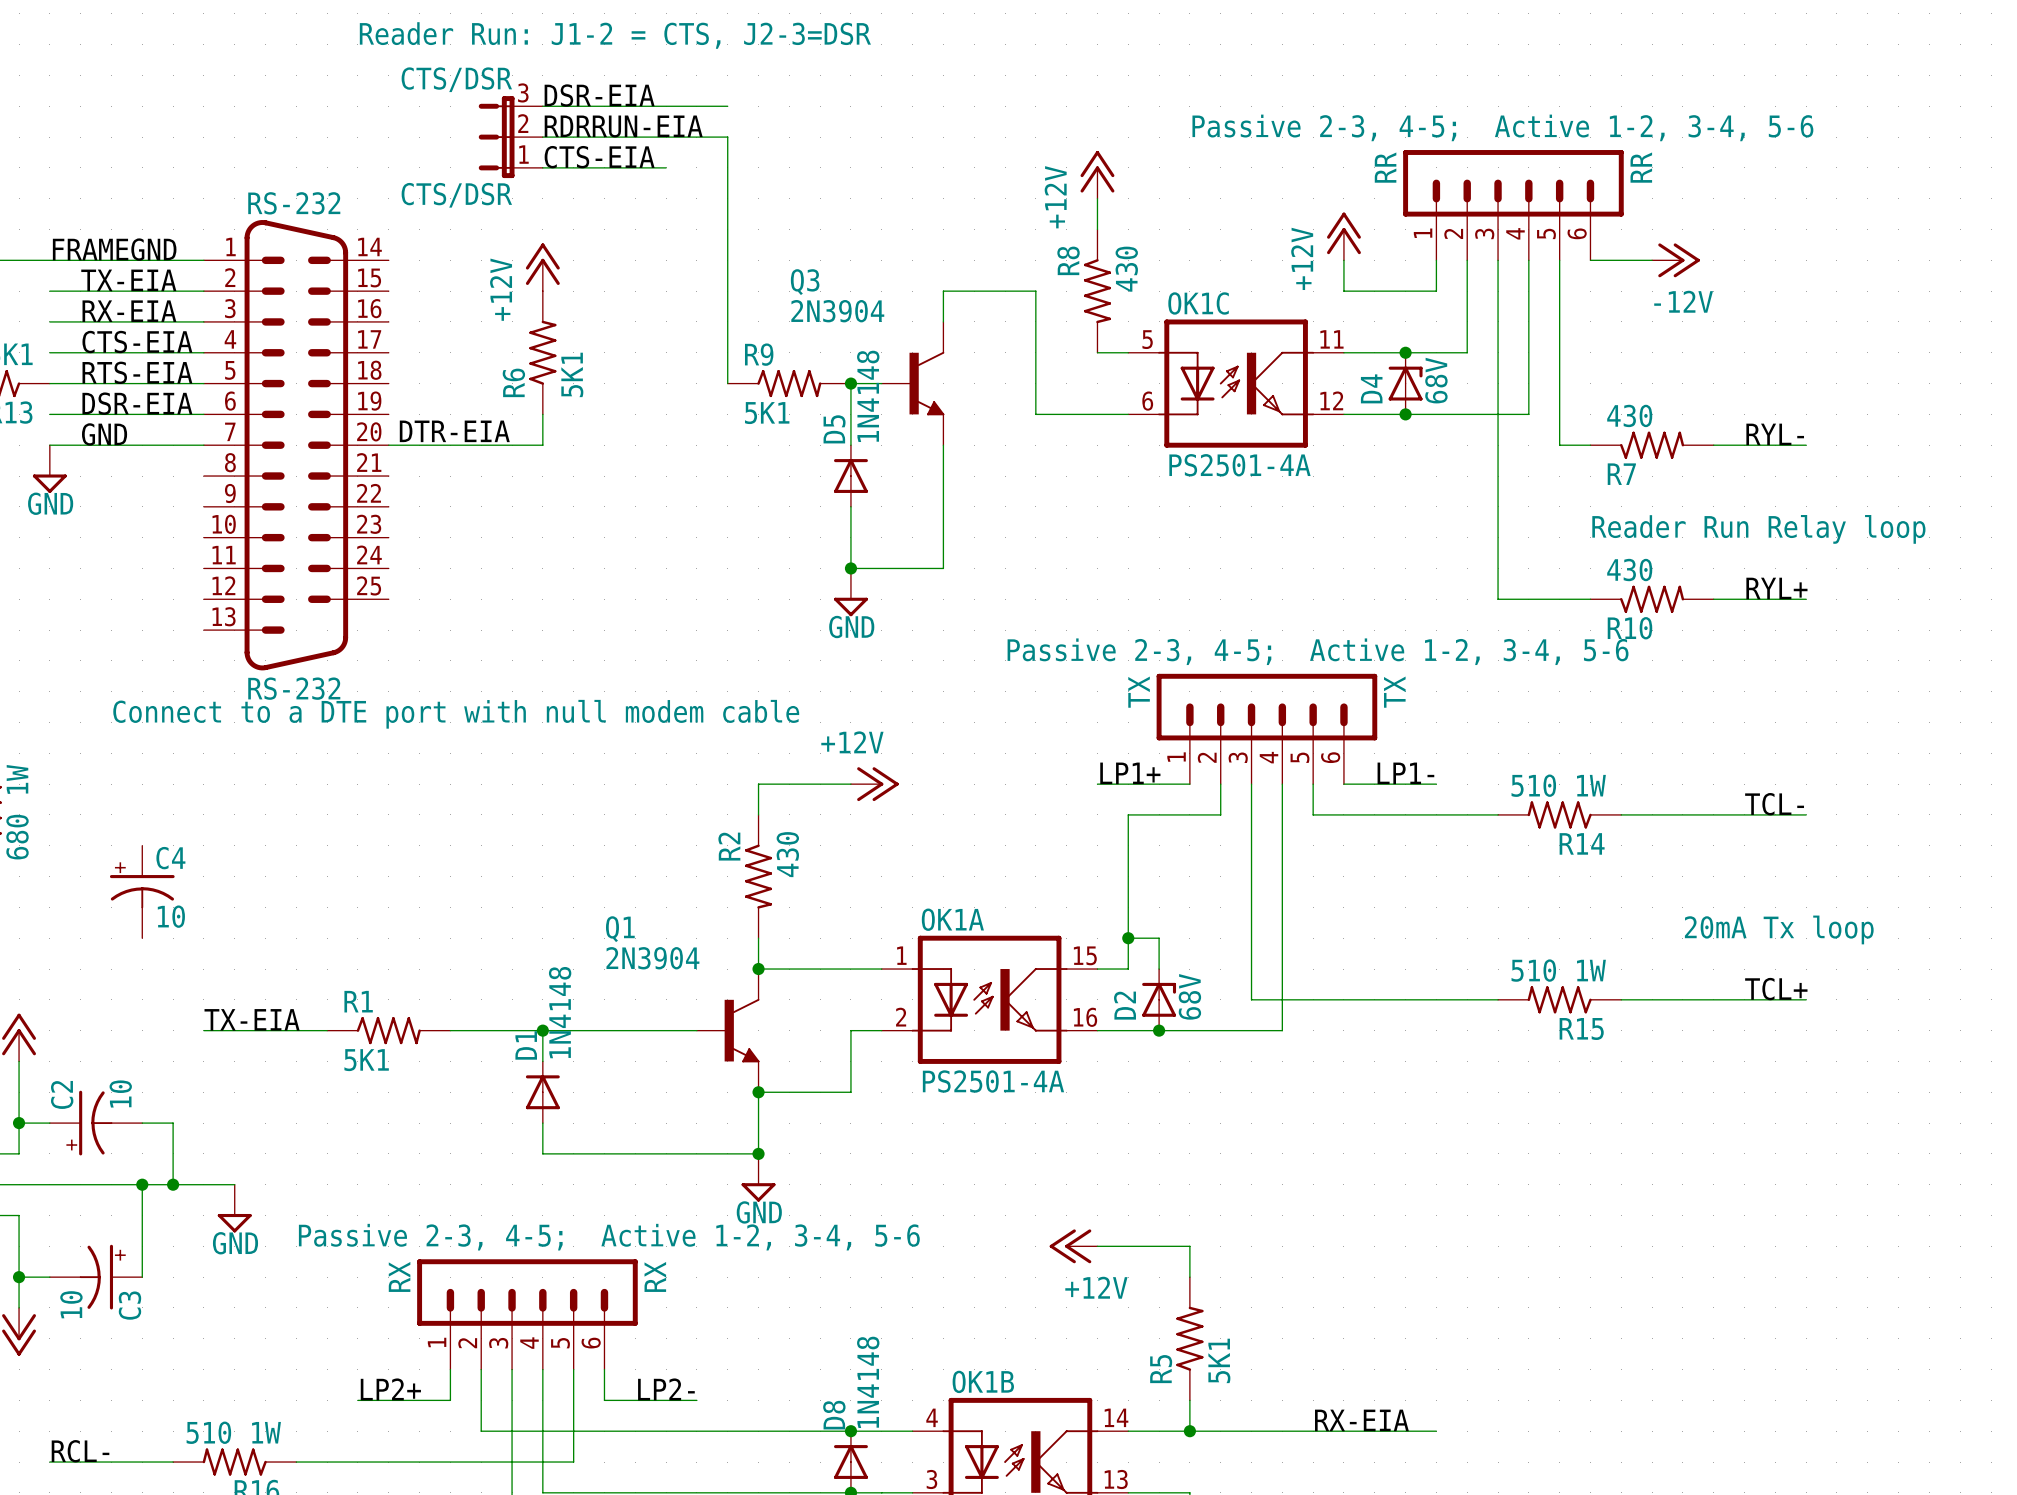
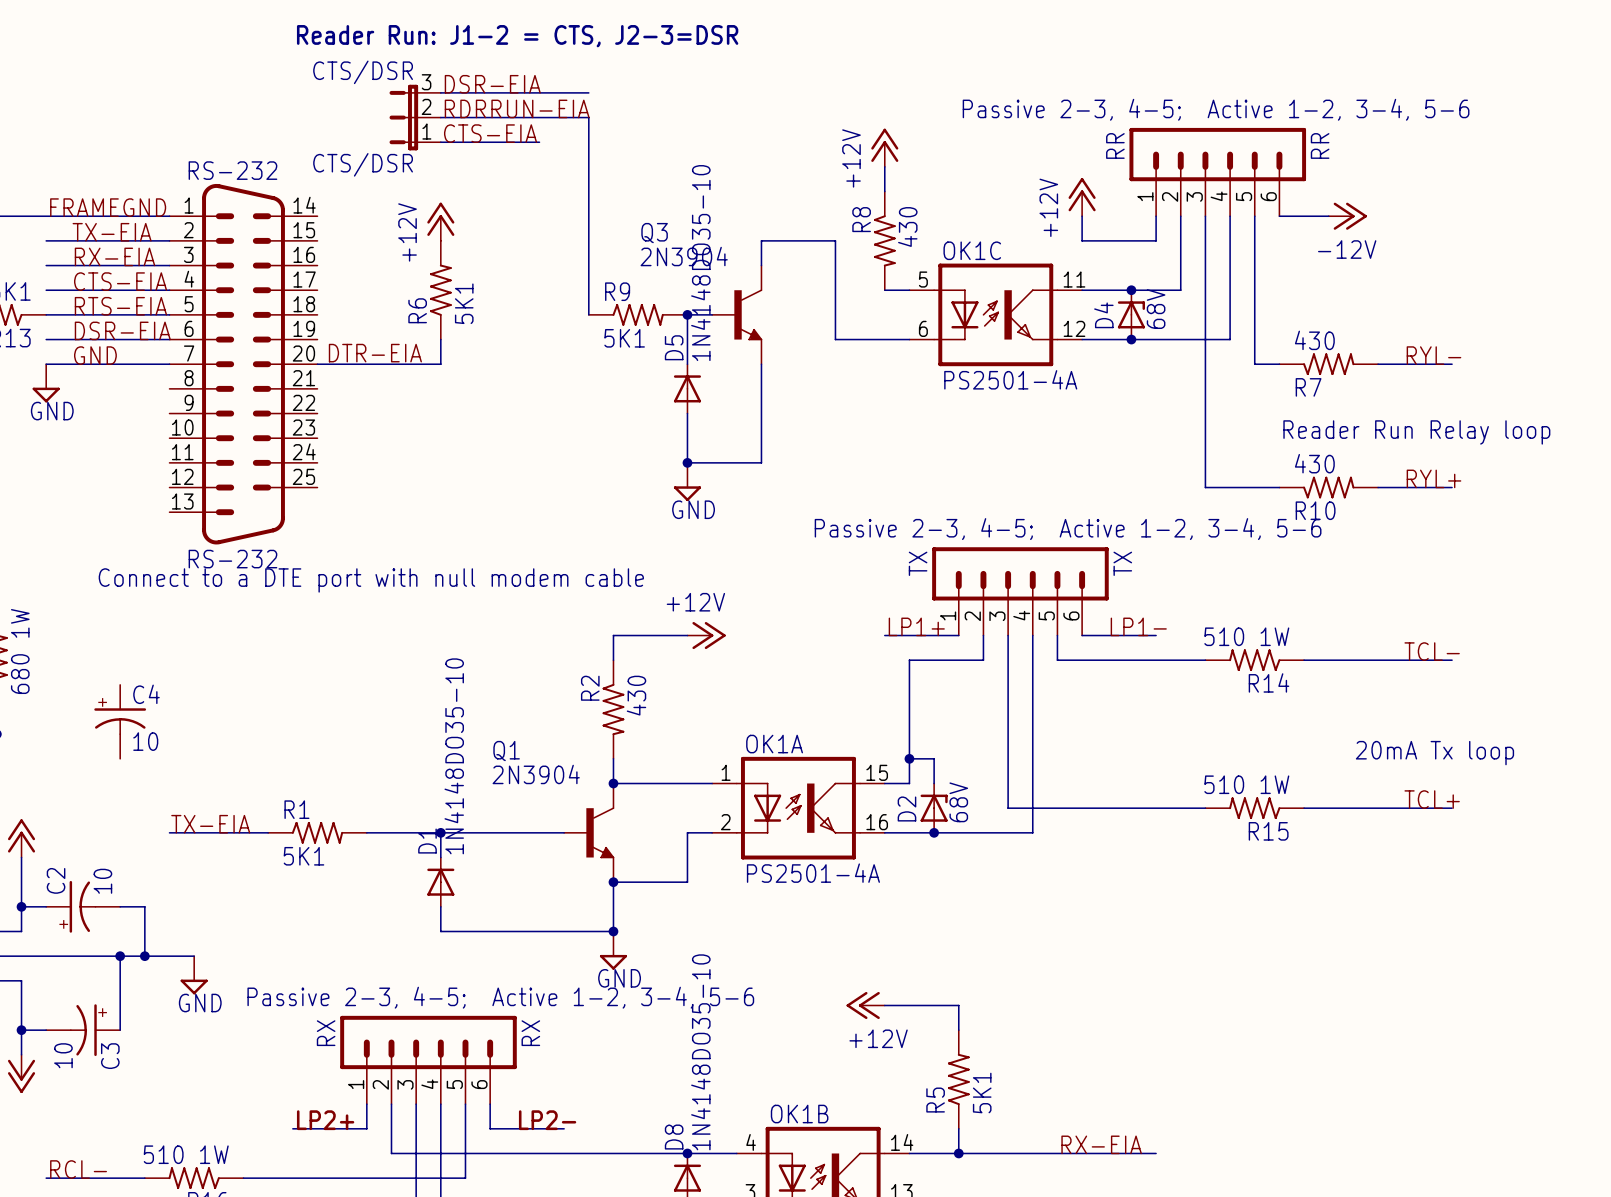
D5 value: 1N4148 (868, 396) -> 1N4148DO35-10 (700, 263)
D1 value: 1N4148 (560, 1012) -> 1N4148DO35-10 (454, 756)
D8 value: 1N4148 (868, 1382) -> 1N4148DO35-10 (700, 1052)

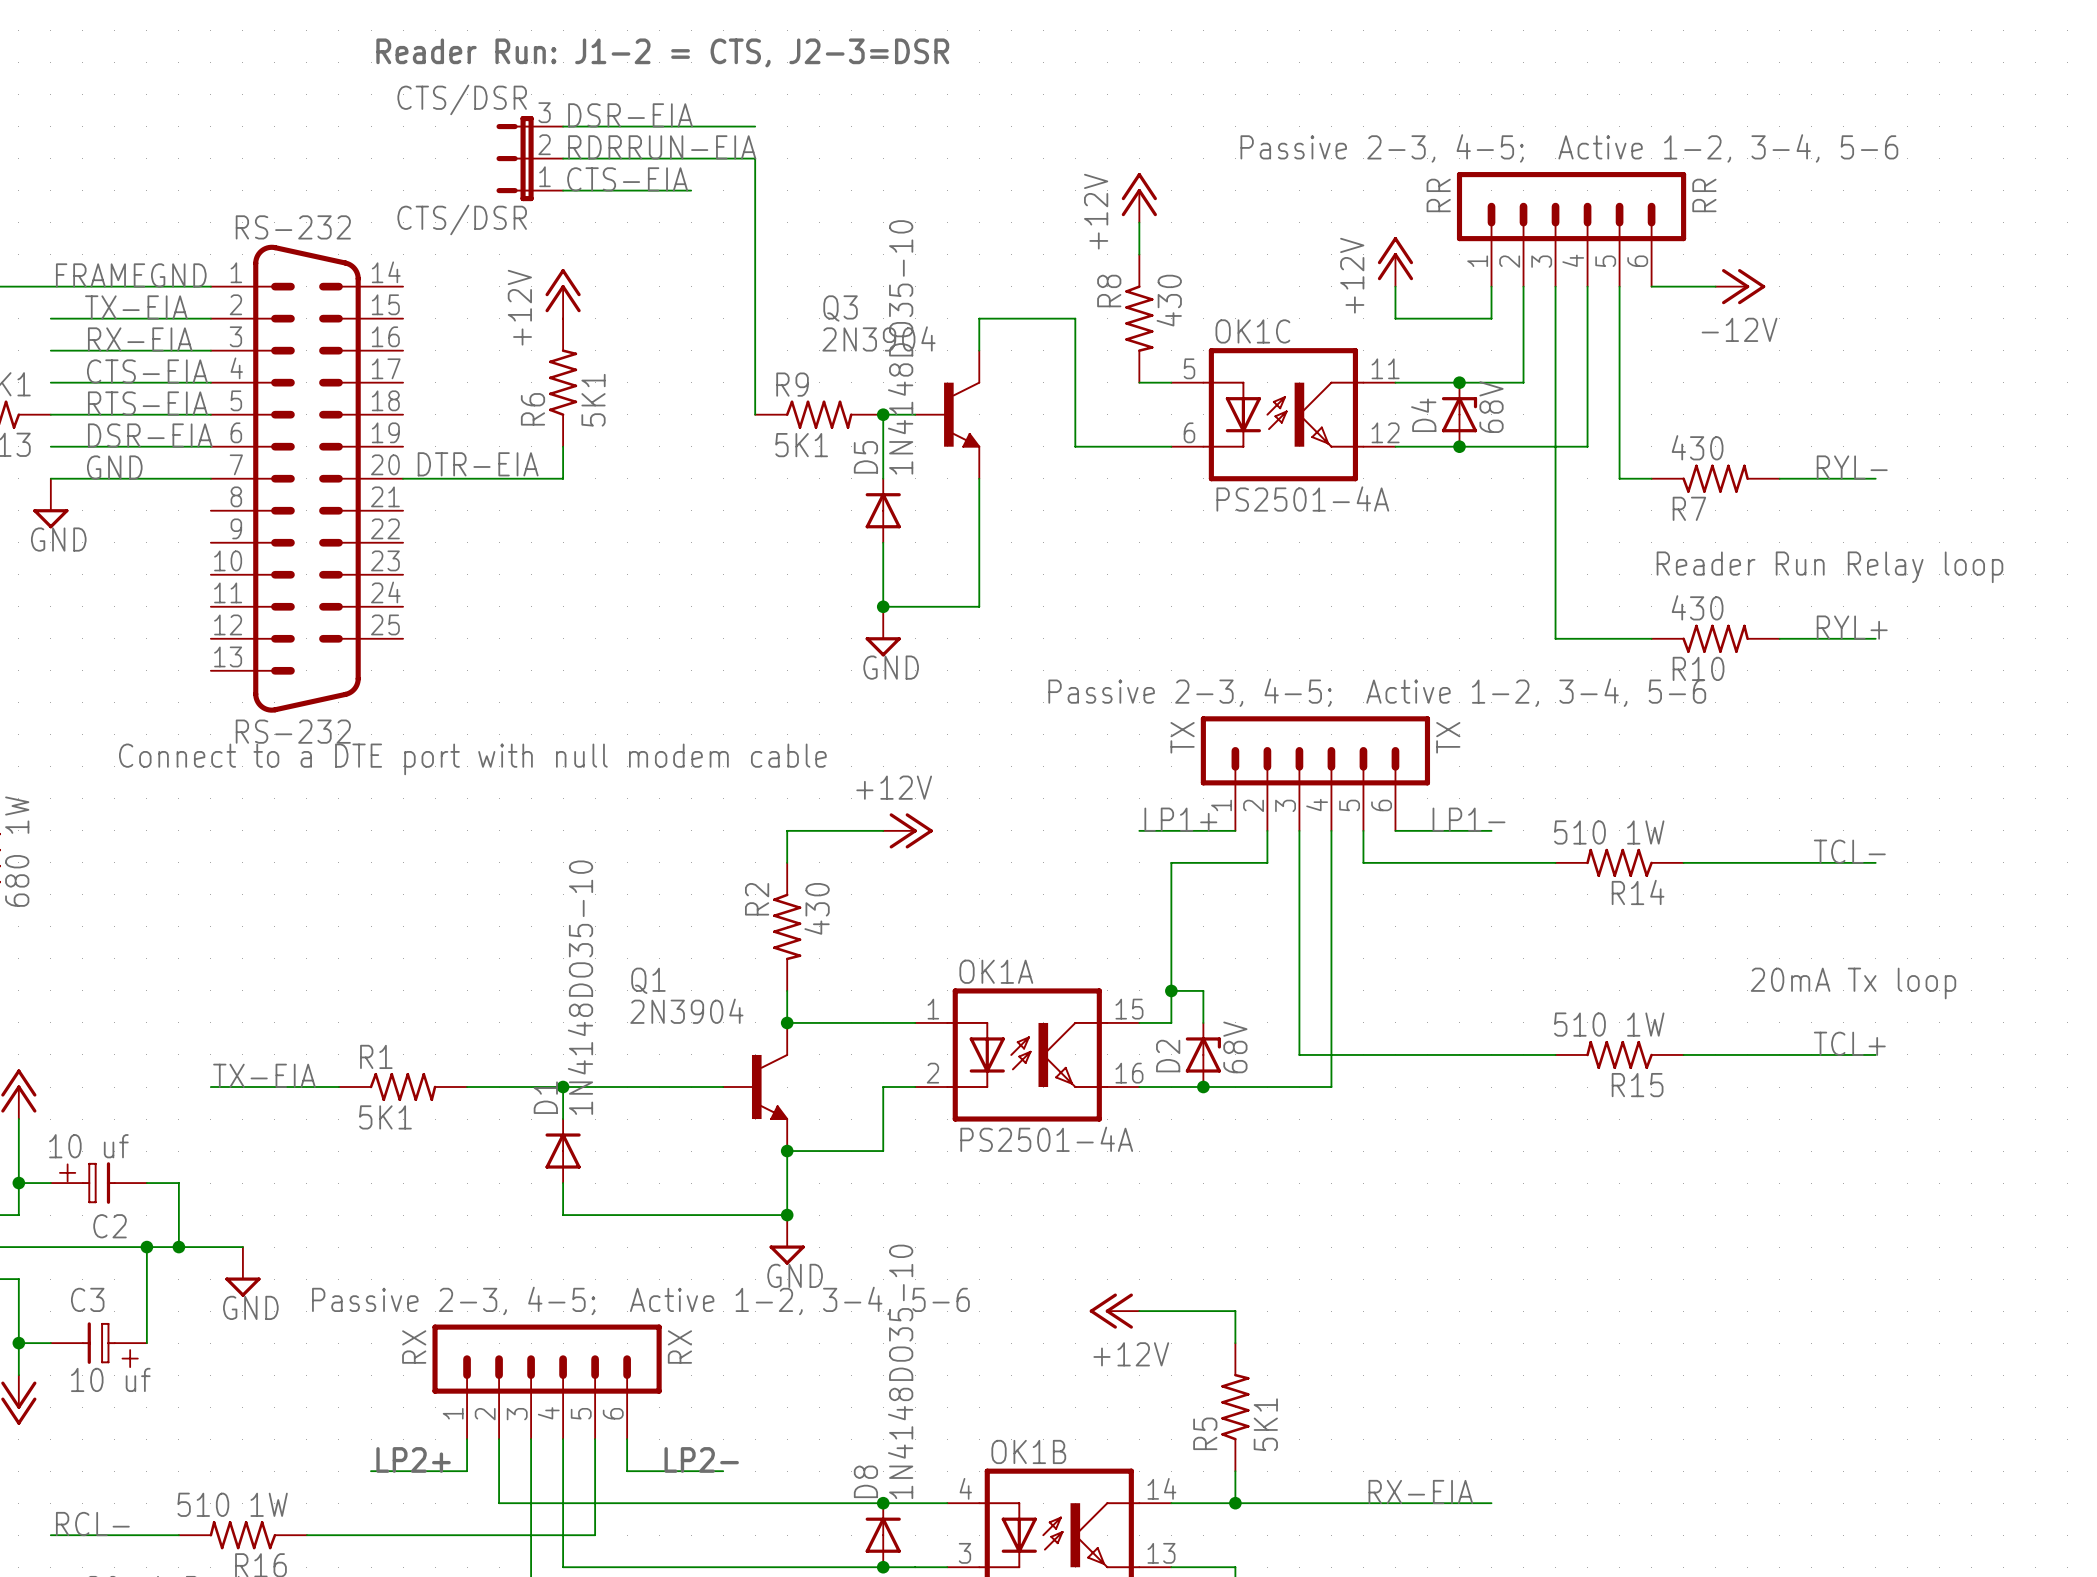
C4: 10 (120, 721) -> none
C2 symbol: [46, 880, 121, 933] -> [50, 1162, 147, 1204]
C2 name position: C2 (56, 880) -> C2 (110, 1226)
C2 value: 10 (102, 881) -> 10 uf (88, 1146)
C3 symbol: [46, 1004, 121, 1057] -> [50, 1322, 147, 1364]
C3 value: 10 (63, 1055) -> 10 uf (110, 1379)
C3 name position: C3 (110, 1056) -> C3 (87, 1299)

